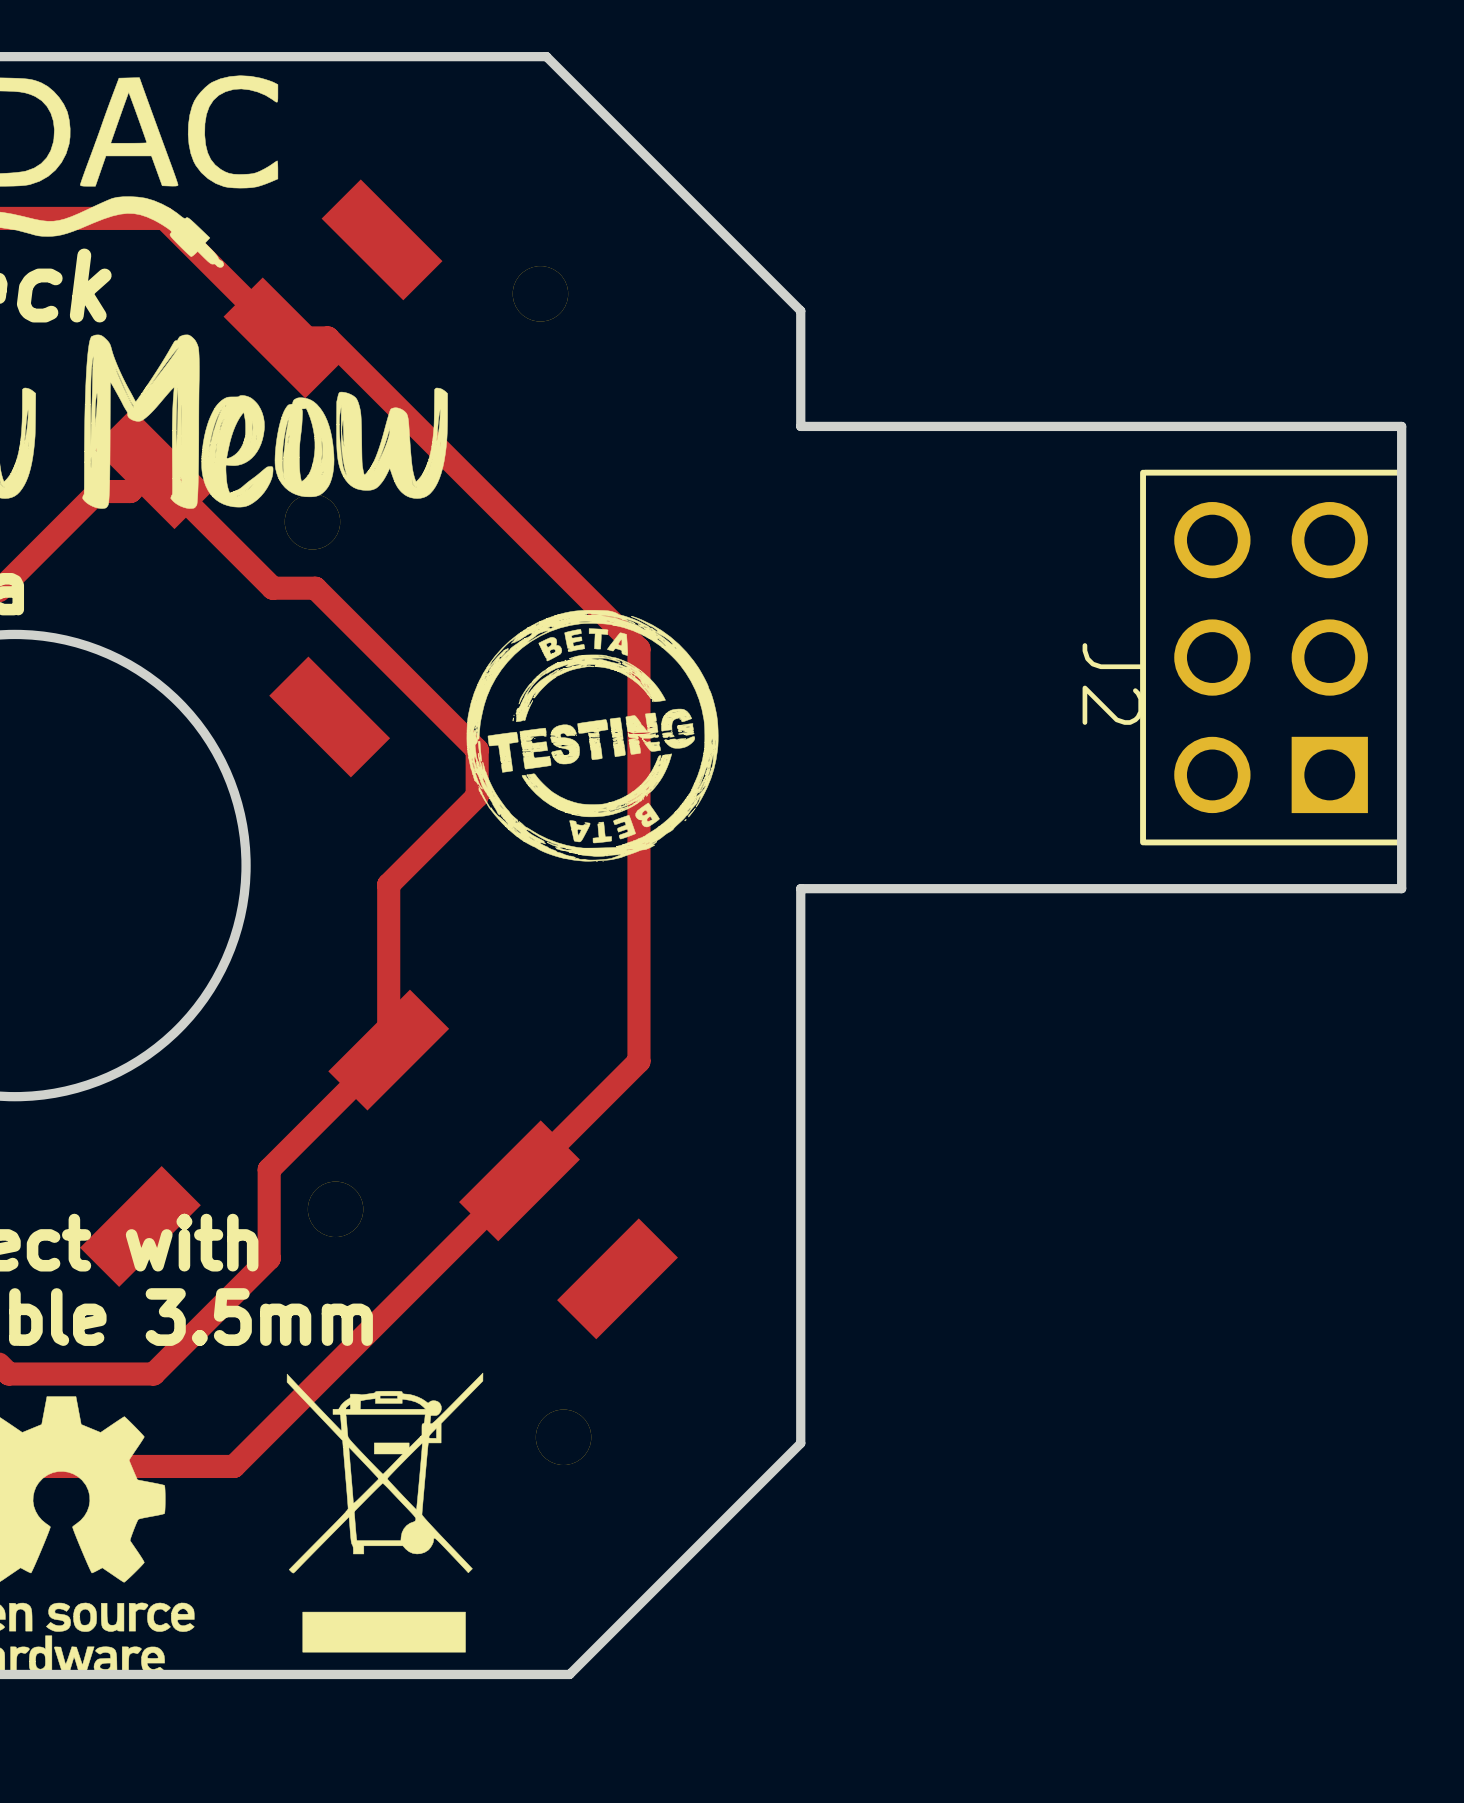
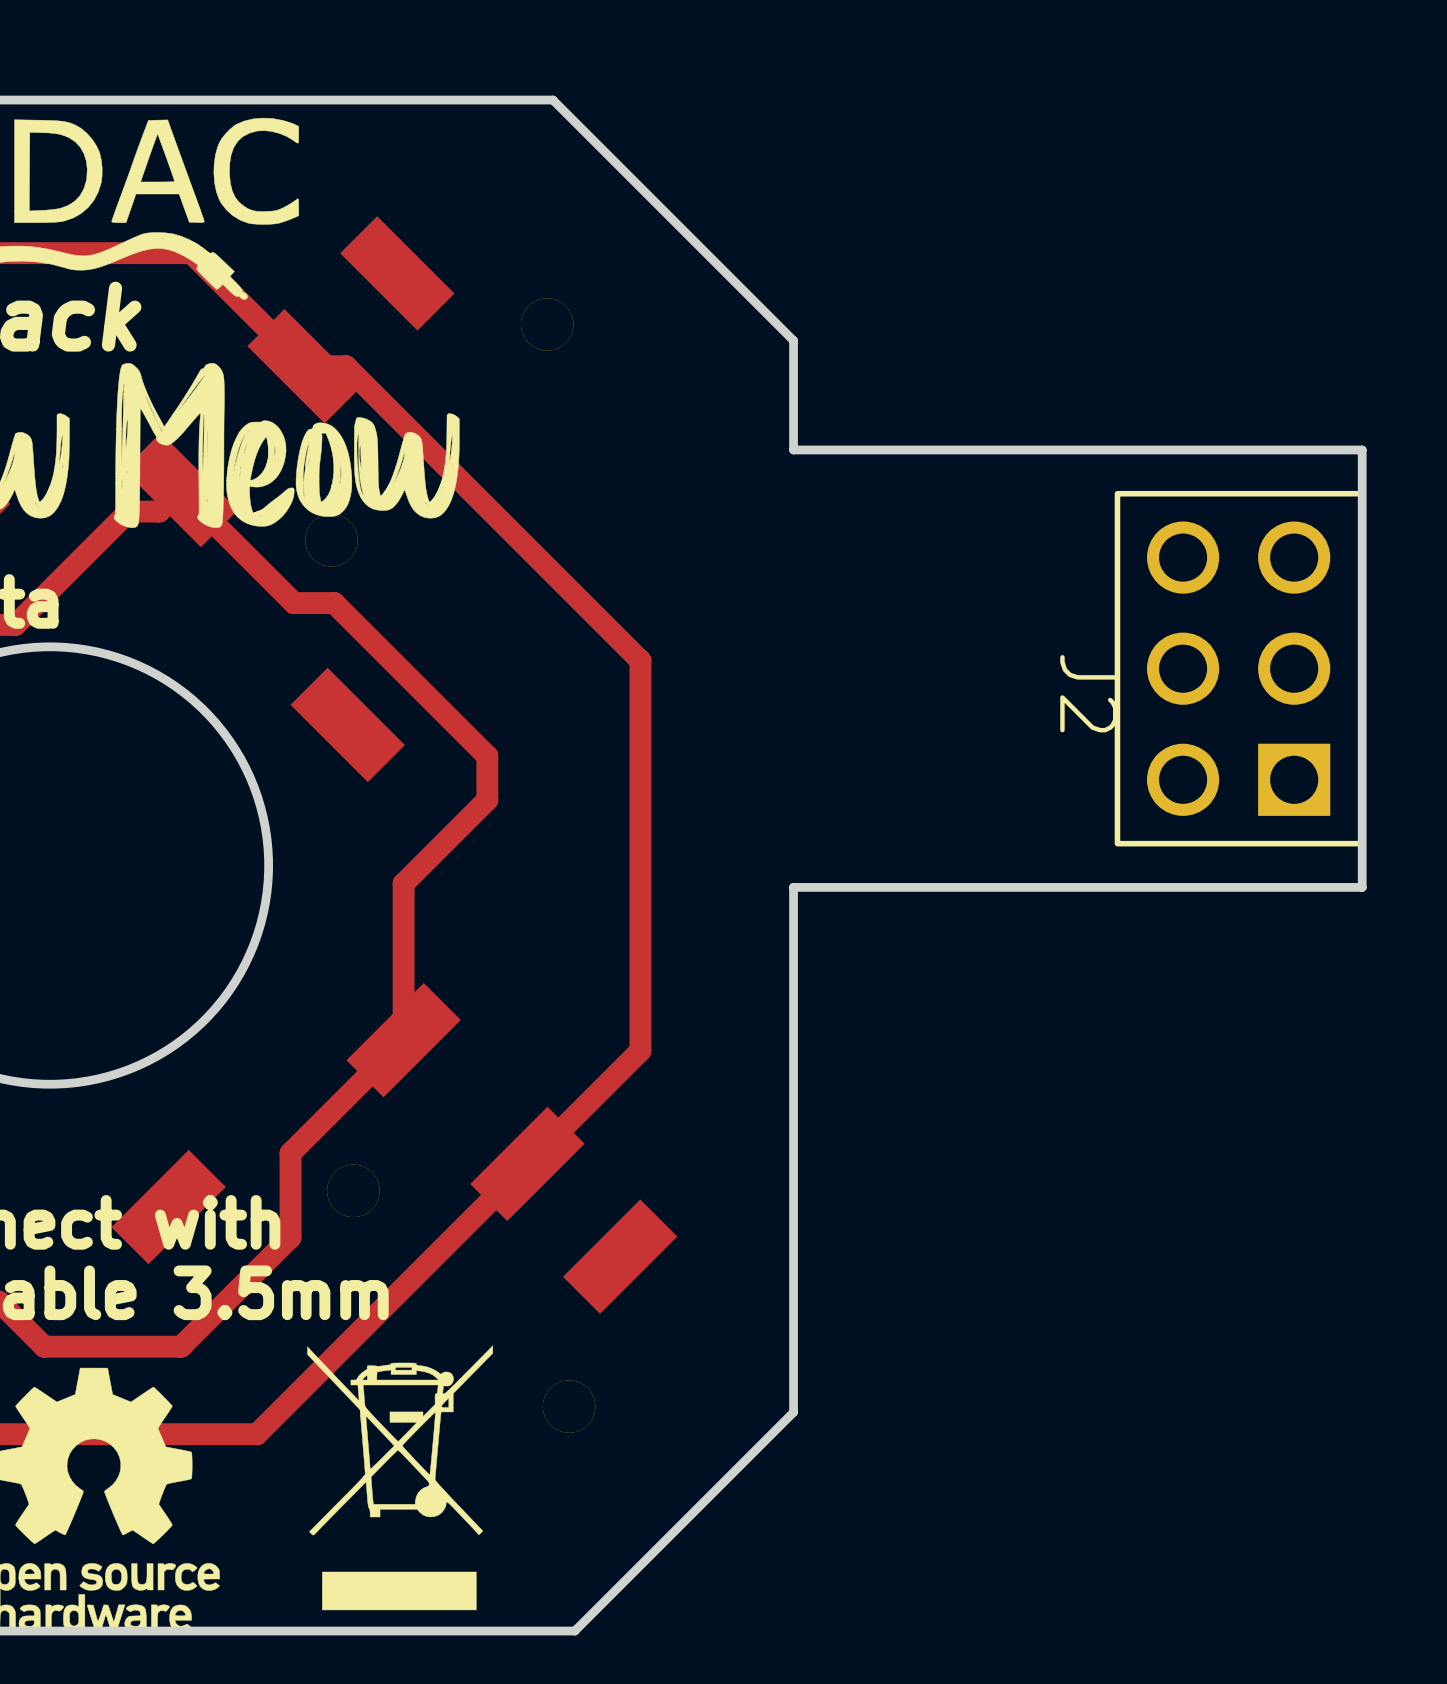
drawing: [466, 610, 719, 862] -> none

